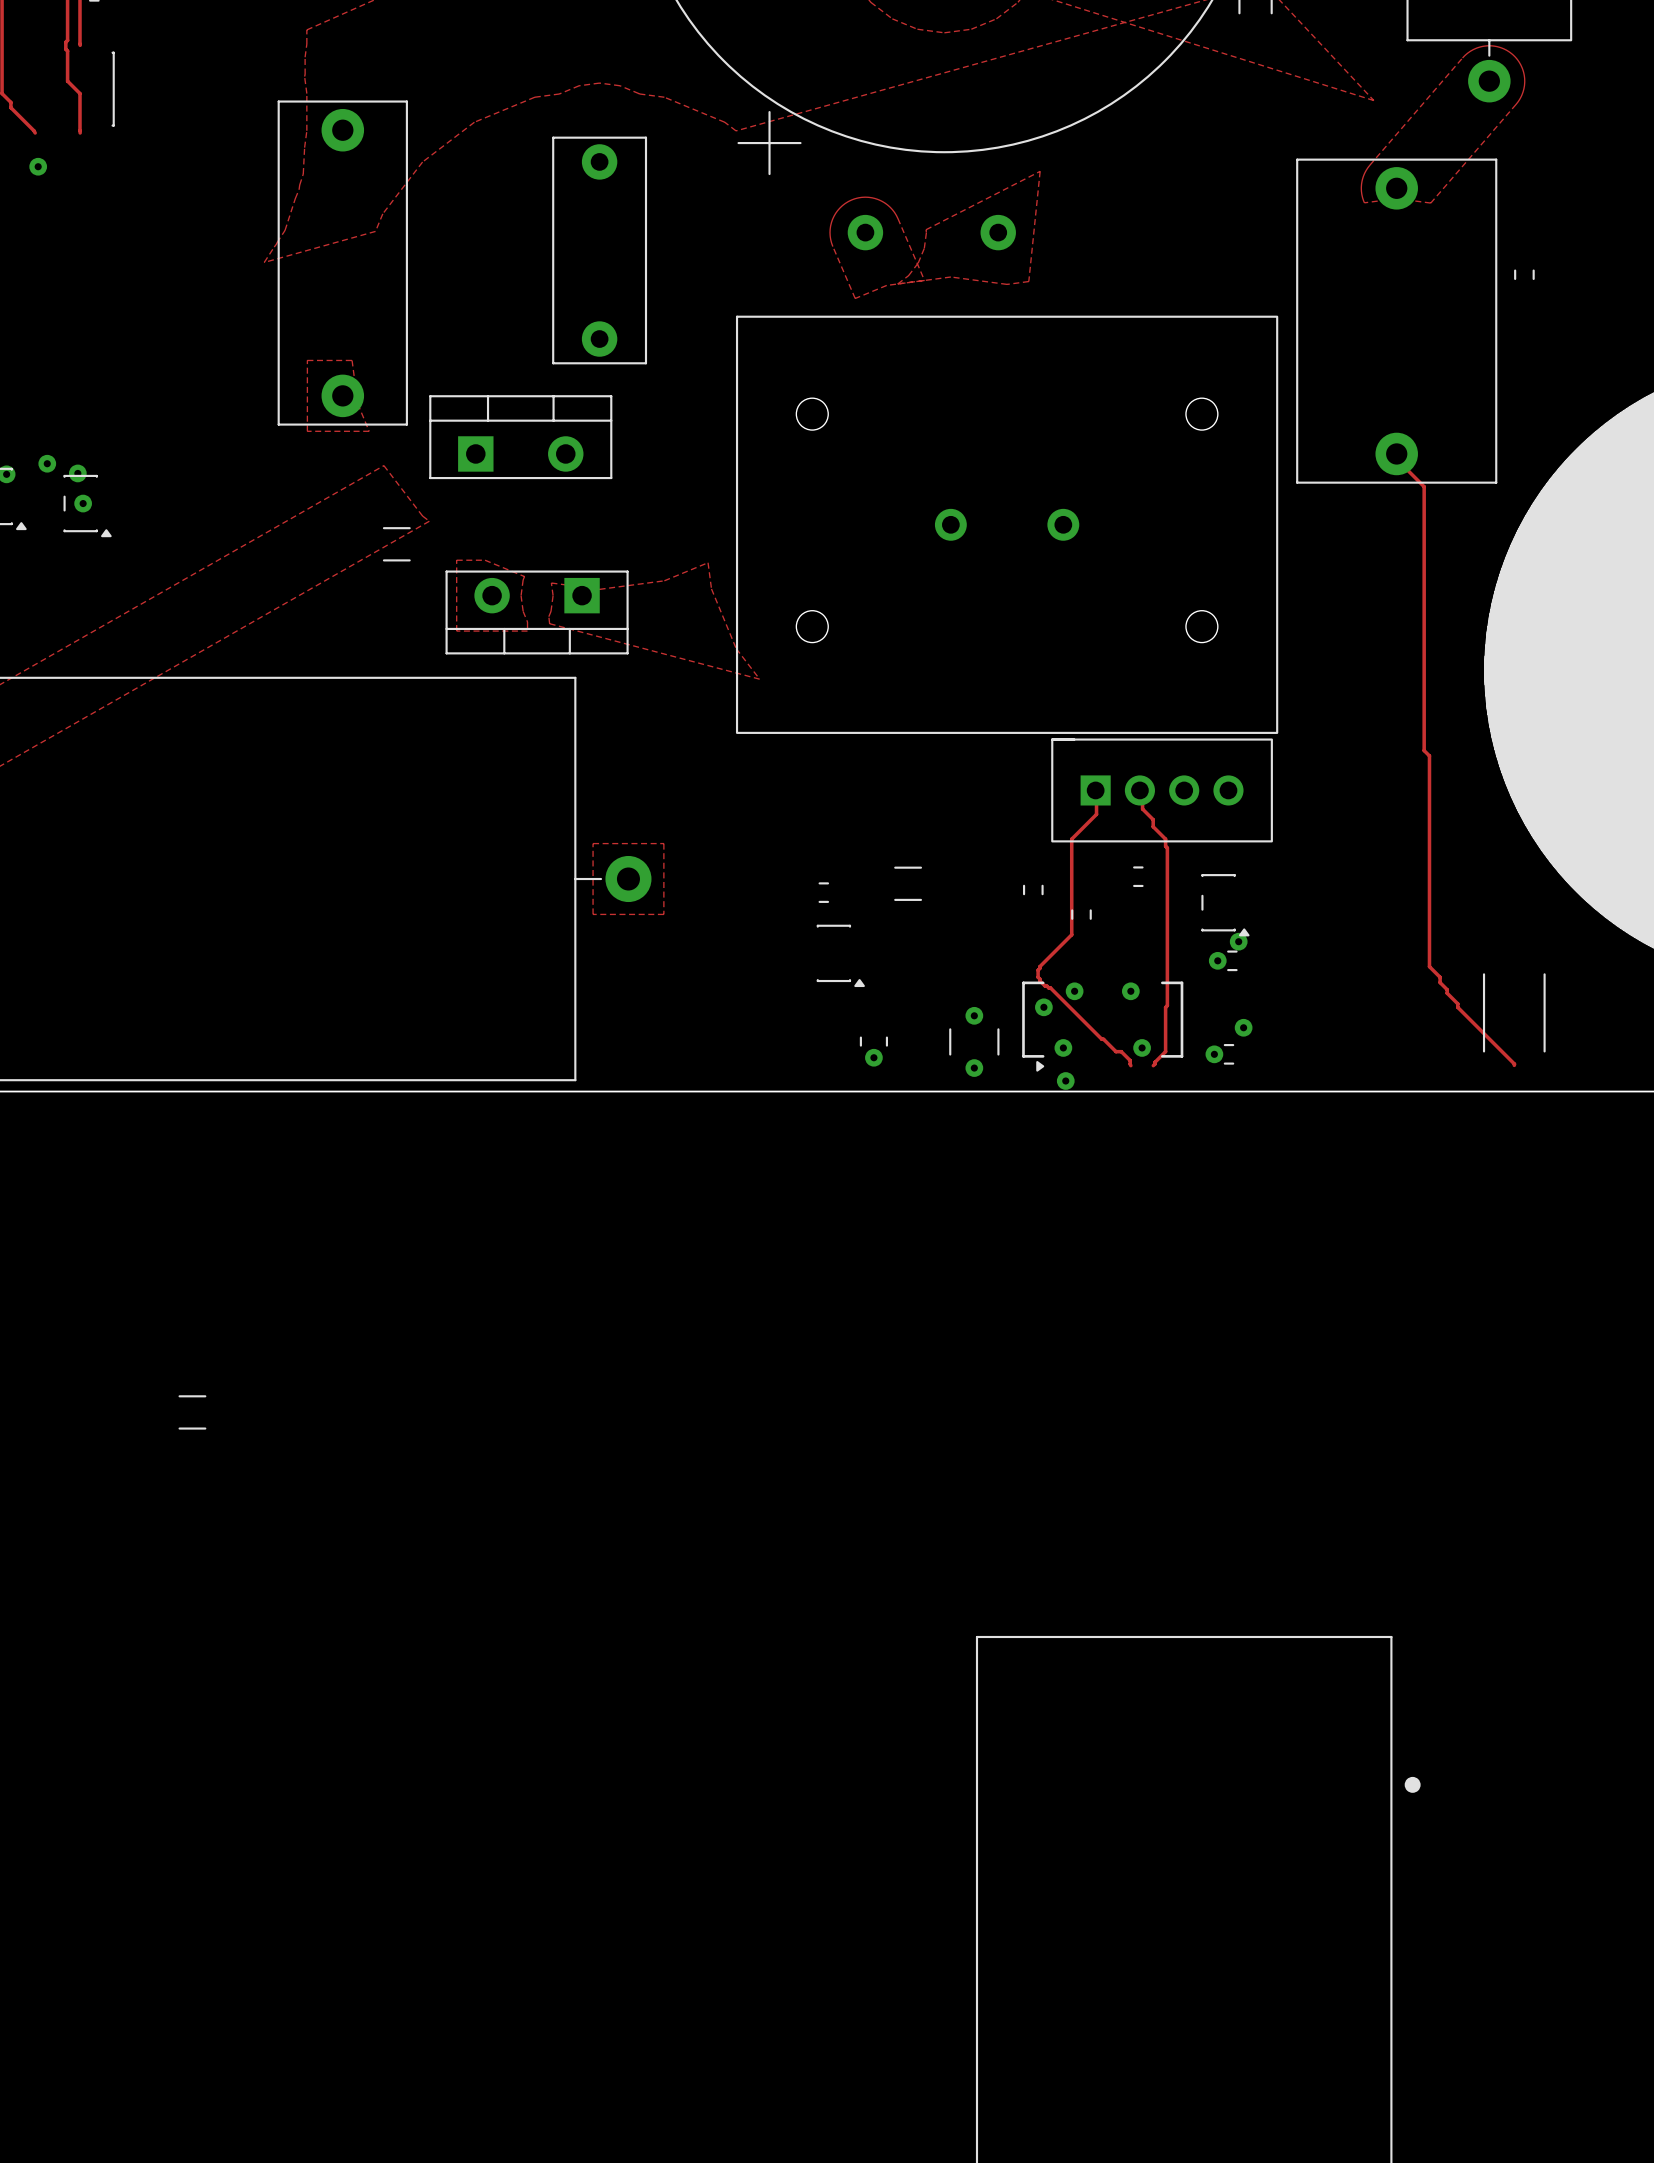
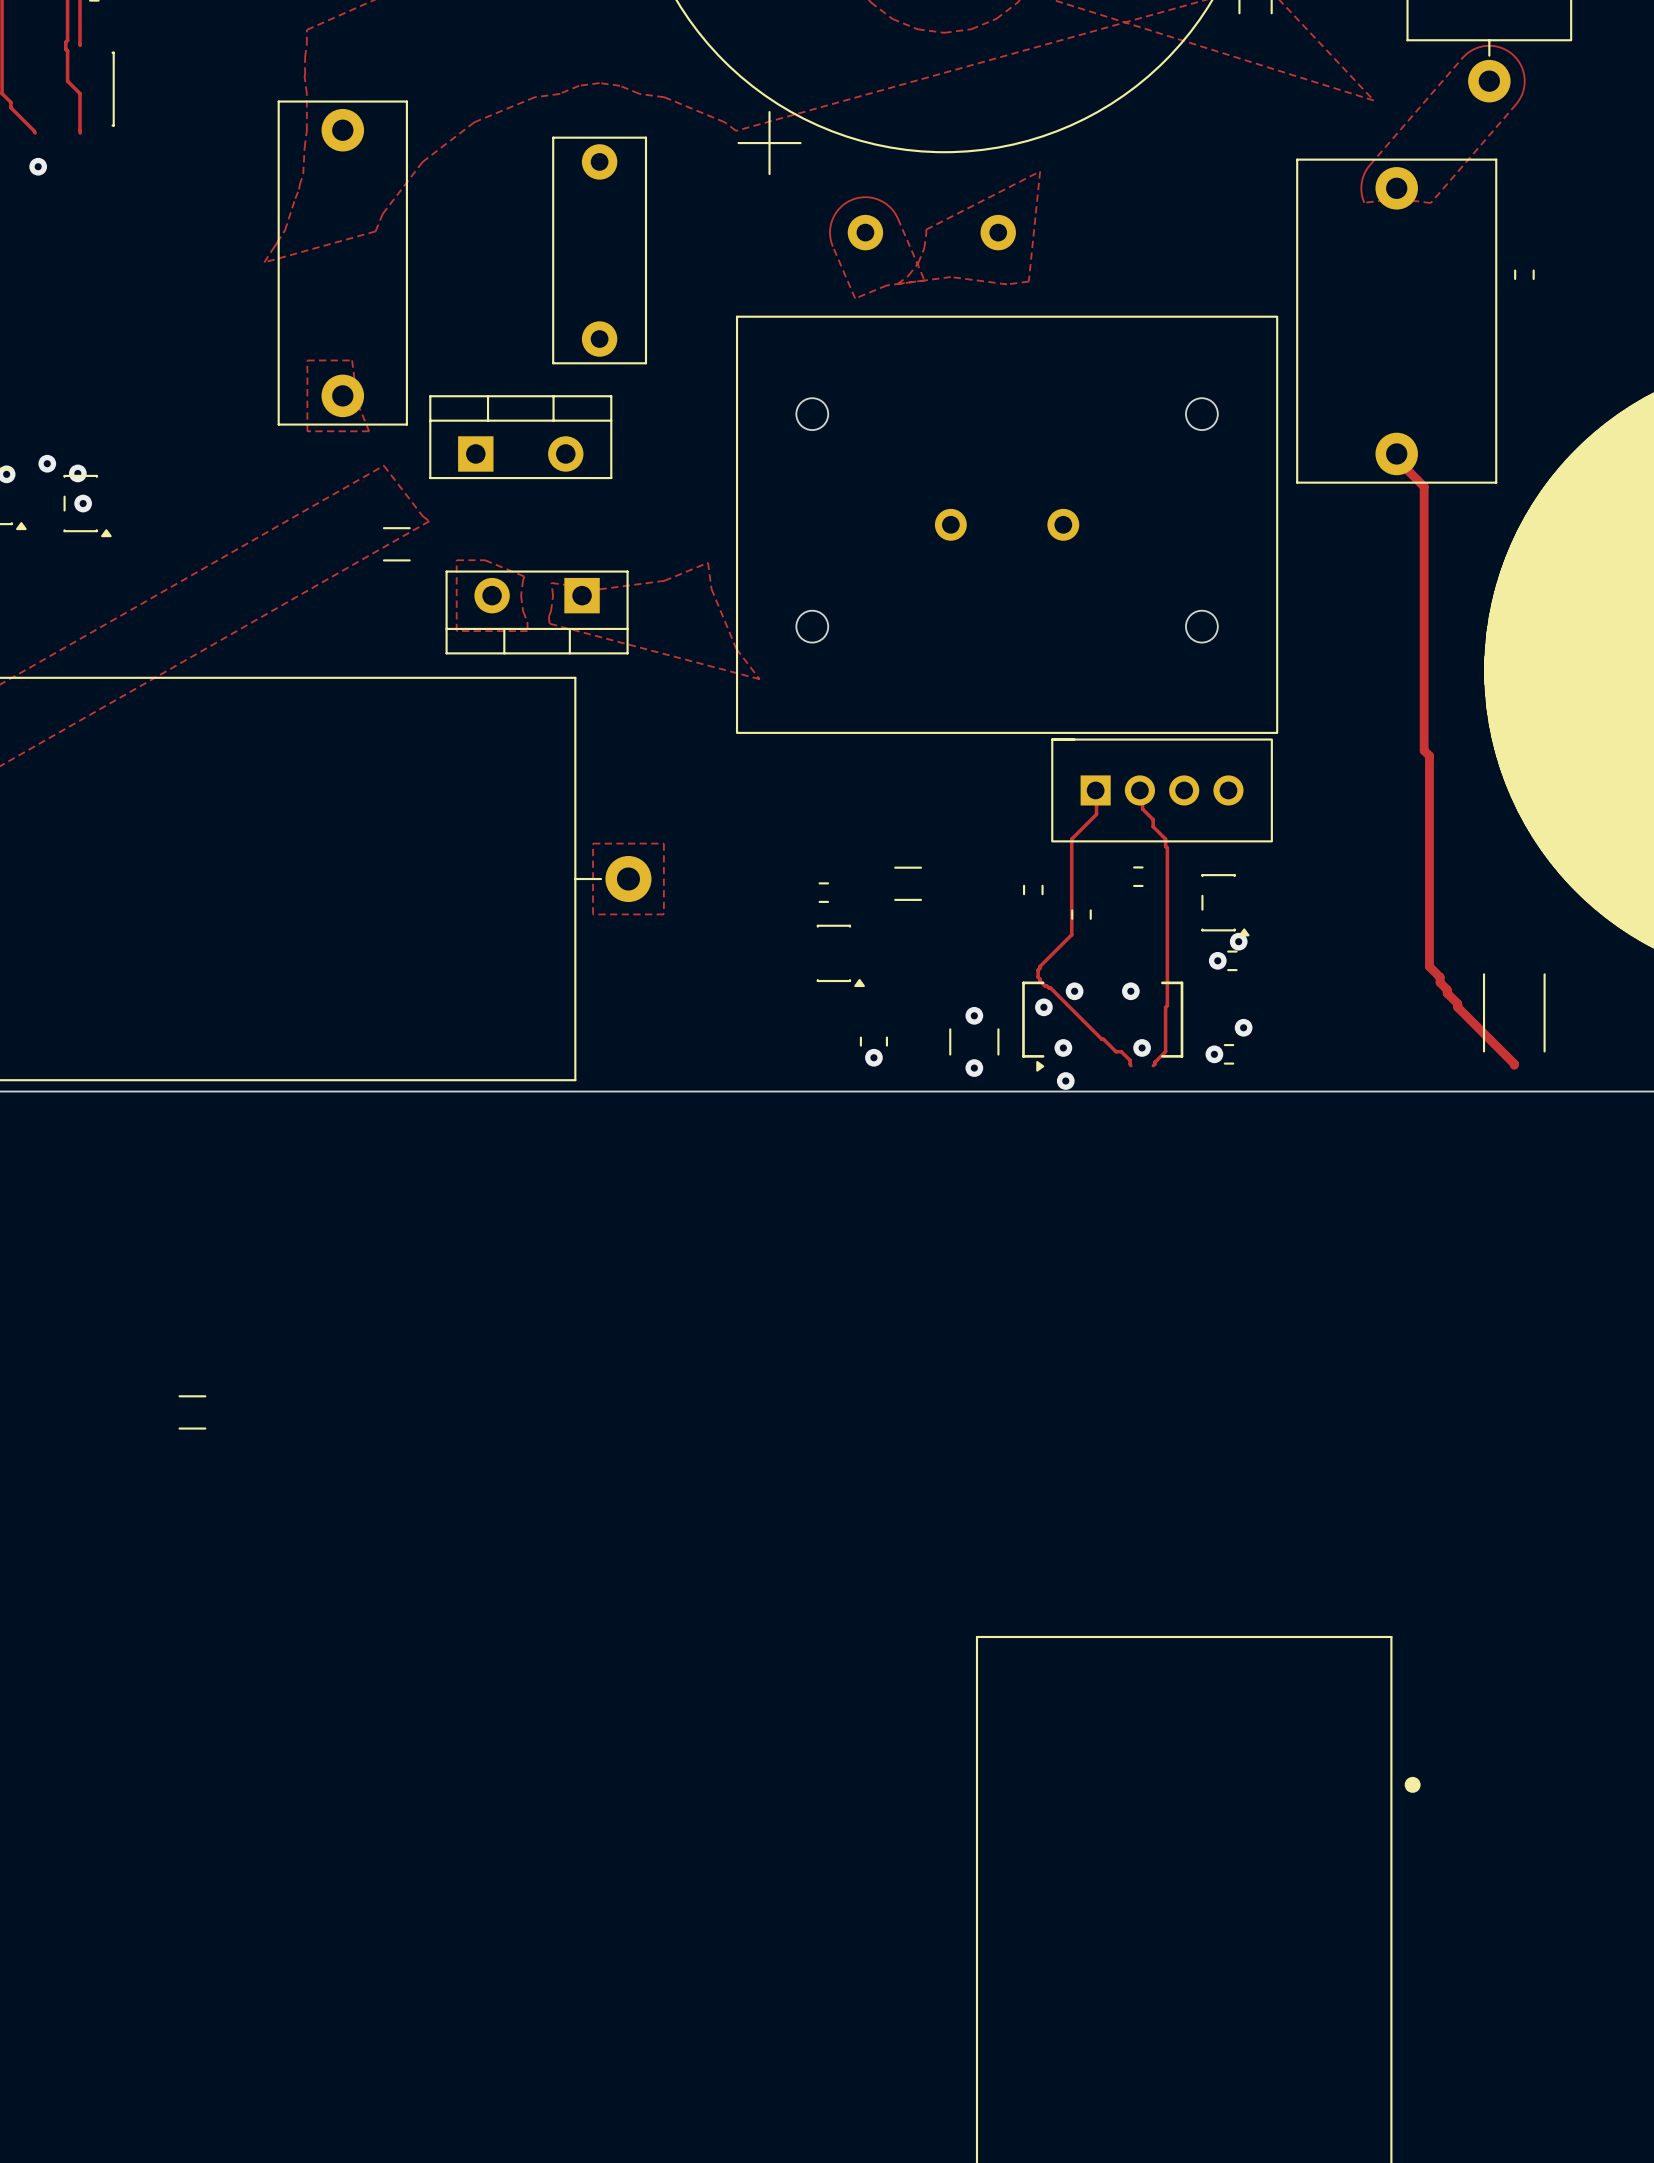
track width: thin (1396, 453) (1404, 461) (1404, 467) (1424, 486) (1424, 750) (1429, 755) (1429, 966) (1440, 977) (1440, 982) (1457, 1003) (1457, 1007) (1514, 1065) -> thick (1396, 453) (1404, 461) (1404, 467) (1424, 486) (1424, 750) (1429, 755) (1429, 966) (1440, 977) (1440, 982) (1457, 1003) (1457, 1007) (1514, 1065)

